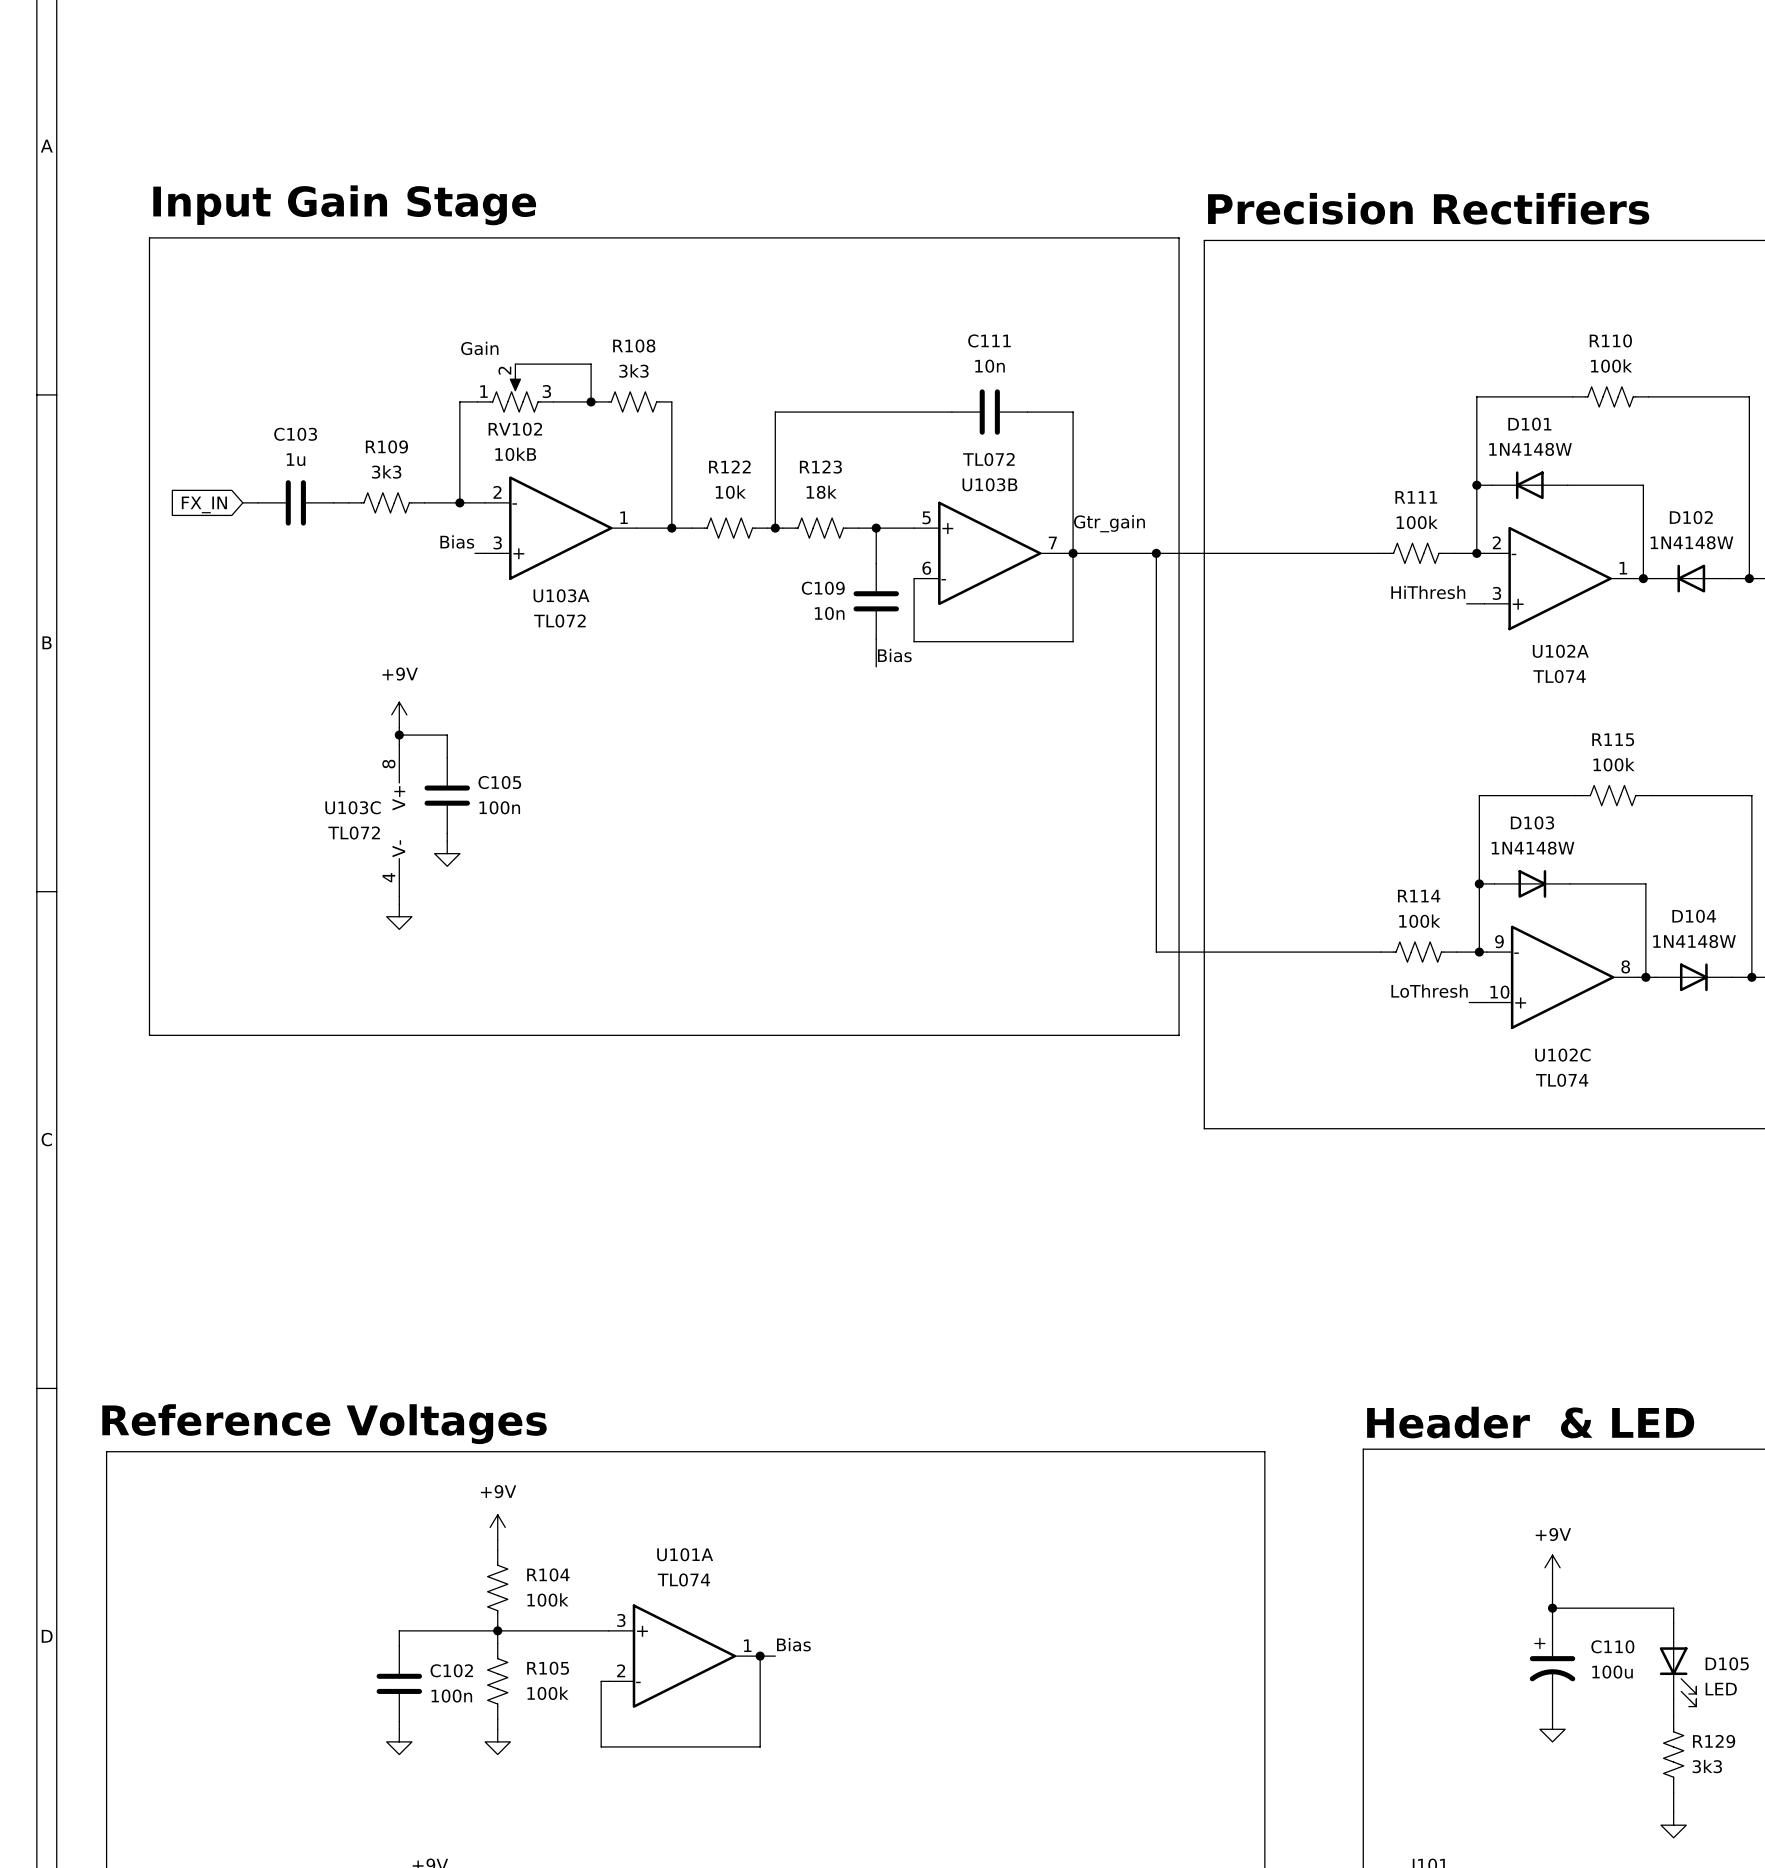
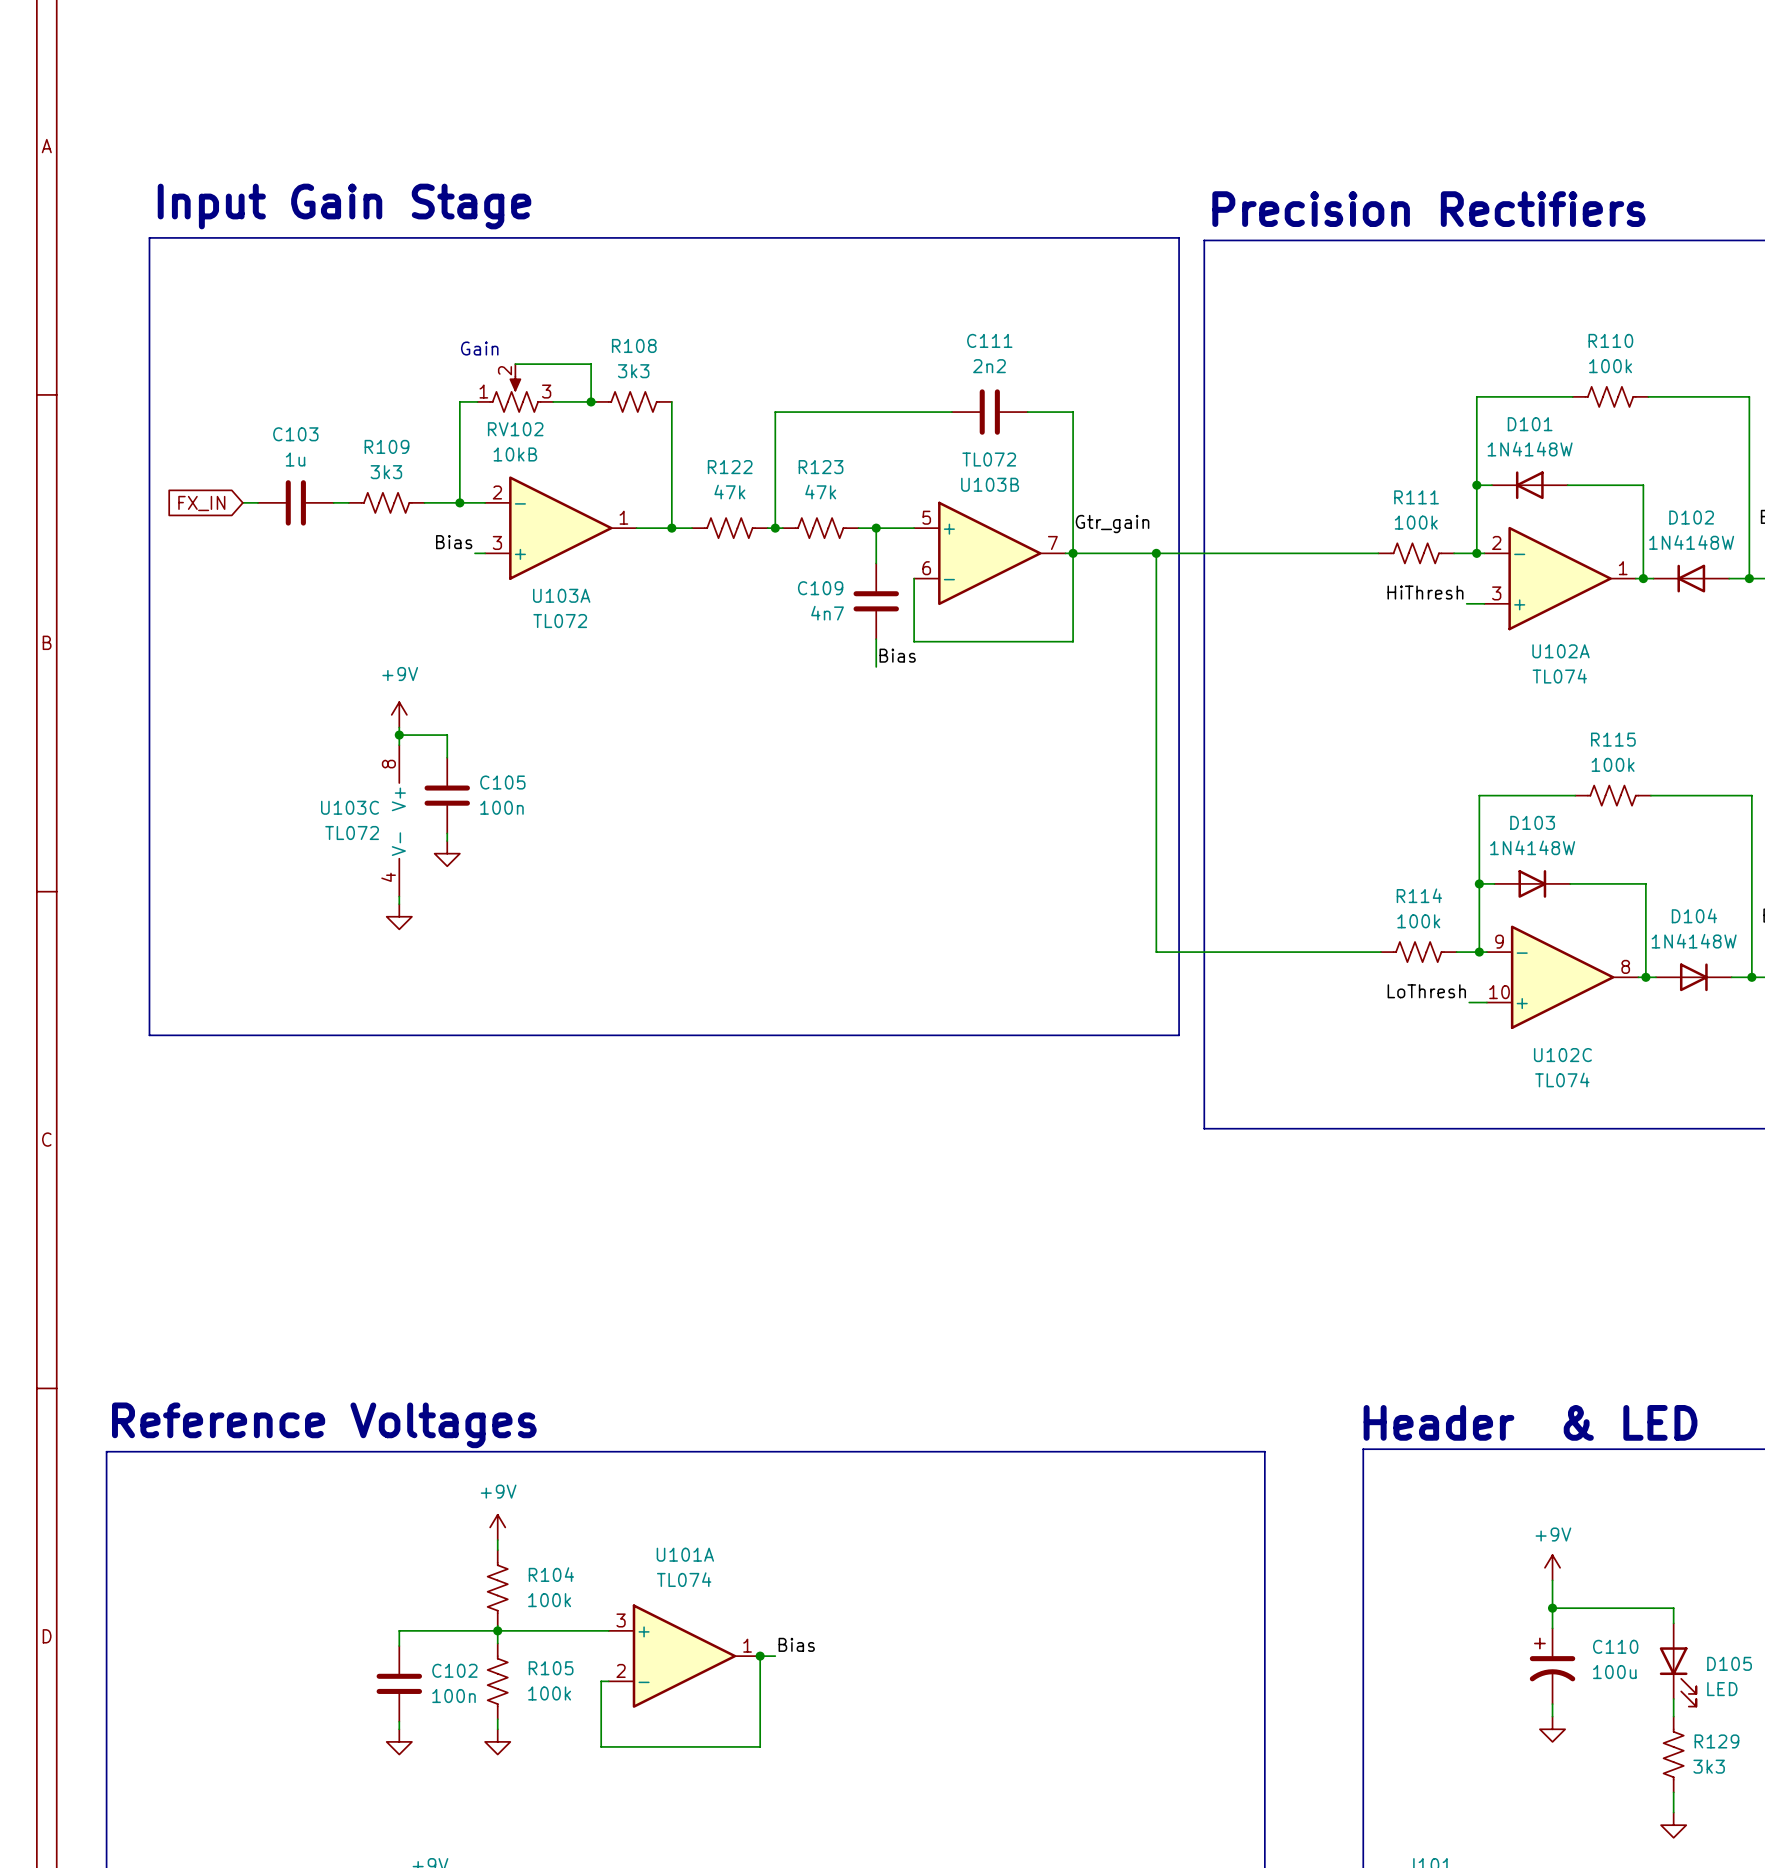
C111 value: 10n (990, 366) -> 2n2 (989, 366)
R122 value: 10k (730, 492) -> 47k (729, 492)
R123 value: 18k (821, 492) -> 47k (820, 492)
C109 value: 10n (829, 613) -> 4n7 (827, 613)

